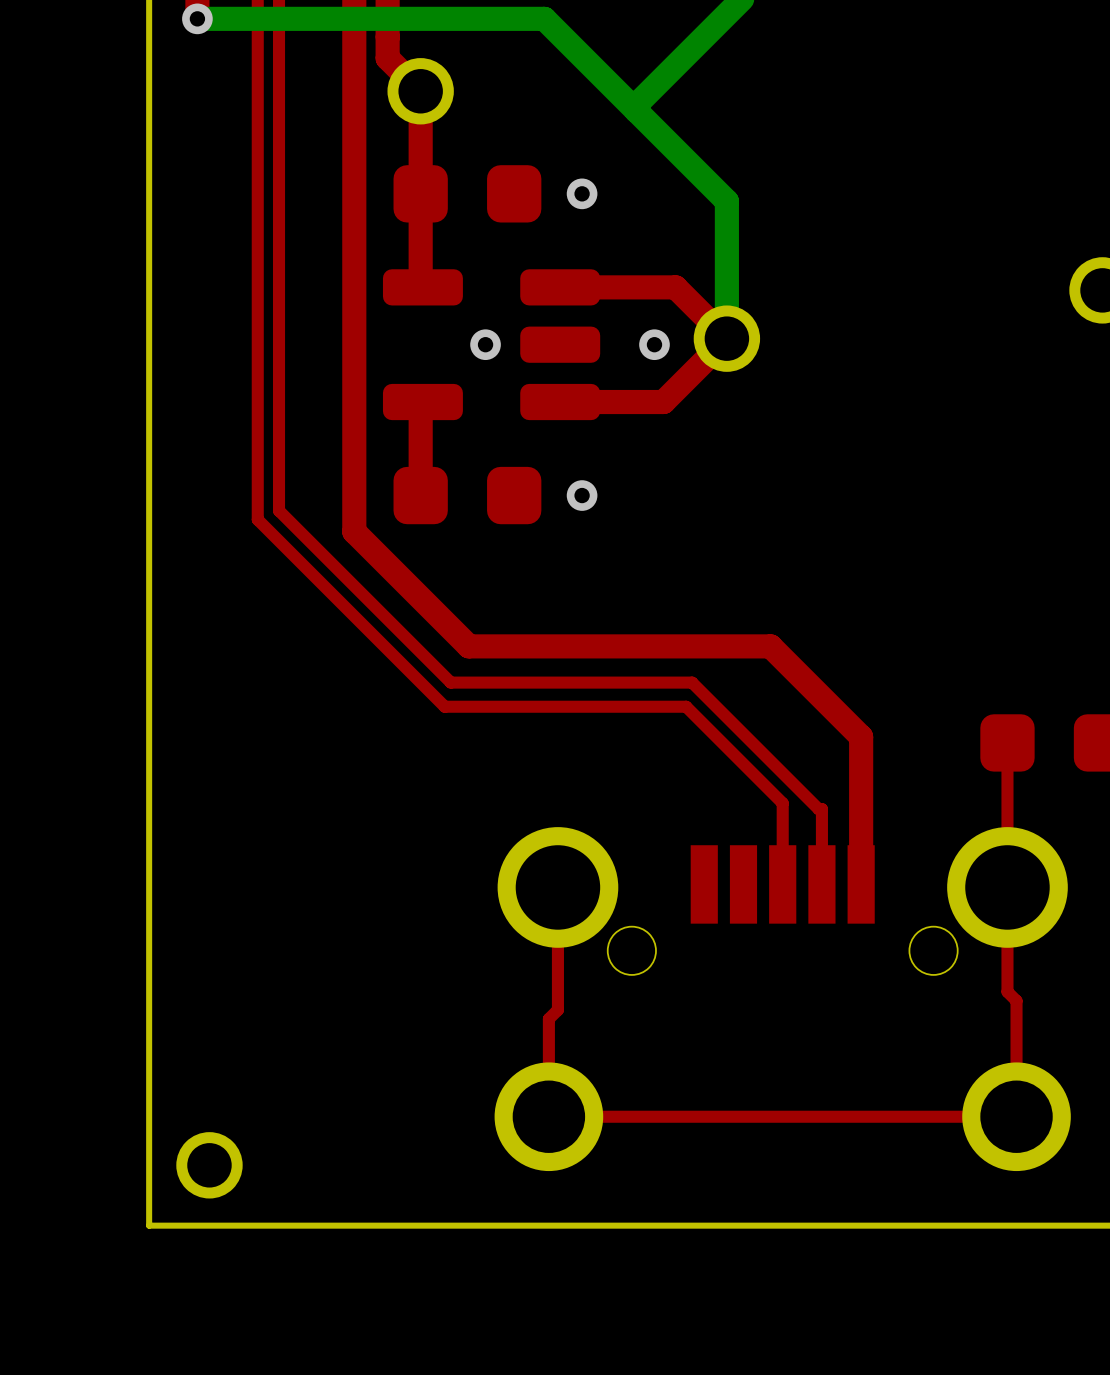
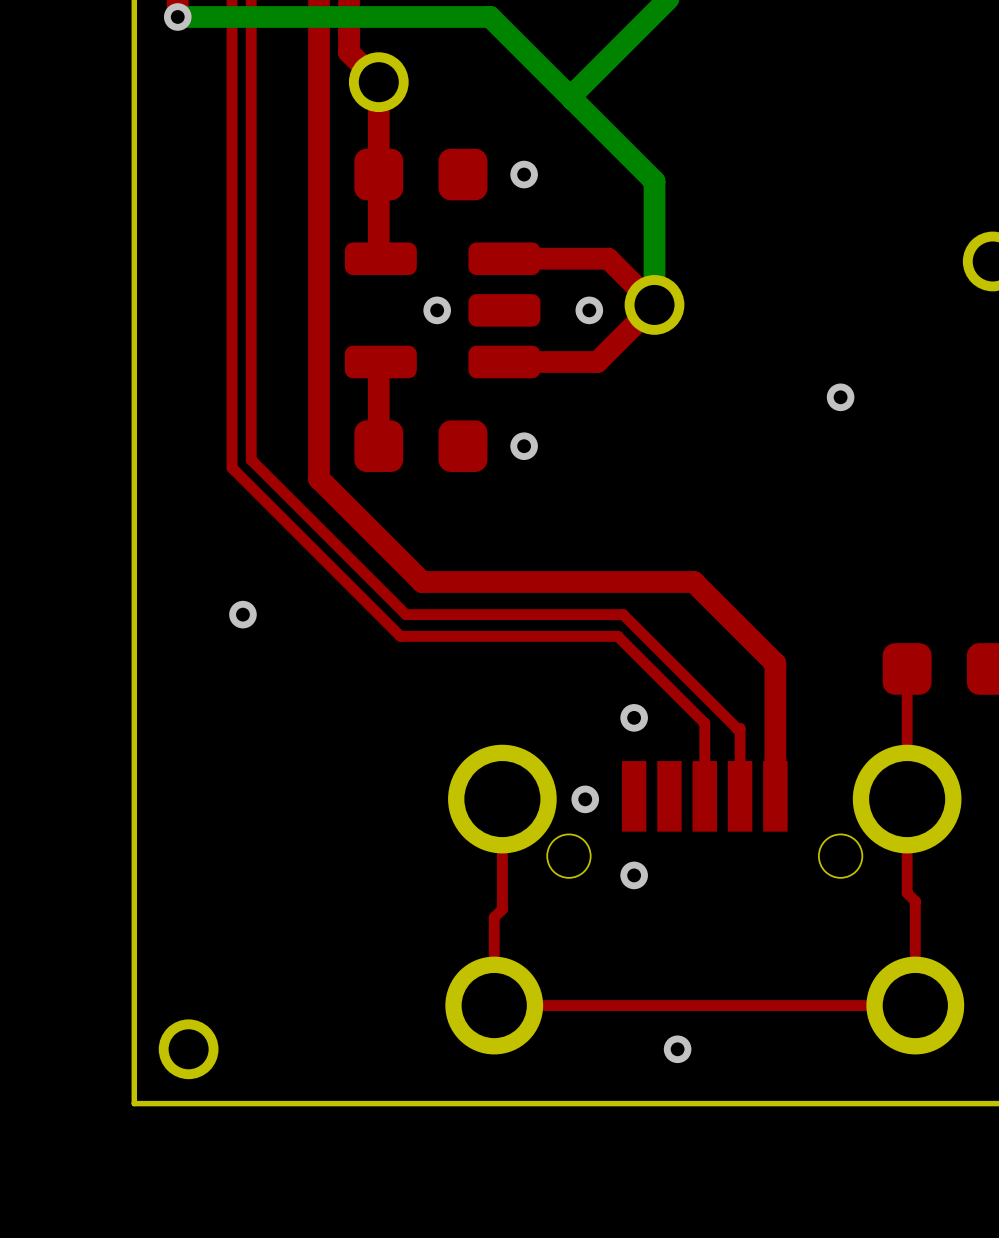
via: none -> (840, 397)
via: none -> (242, 614)
via: none -> (634, 717)
via: none -> (585, 799)
via: none -> (634, 875)
via: none -> (677, 1049)

